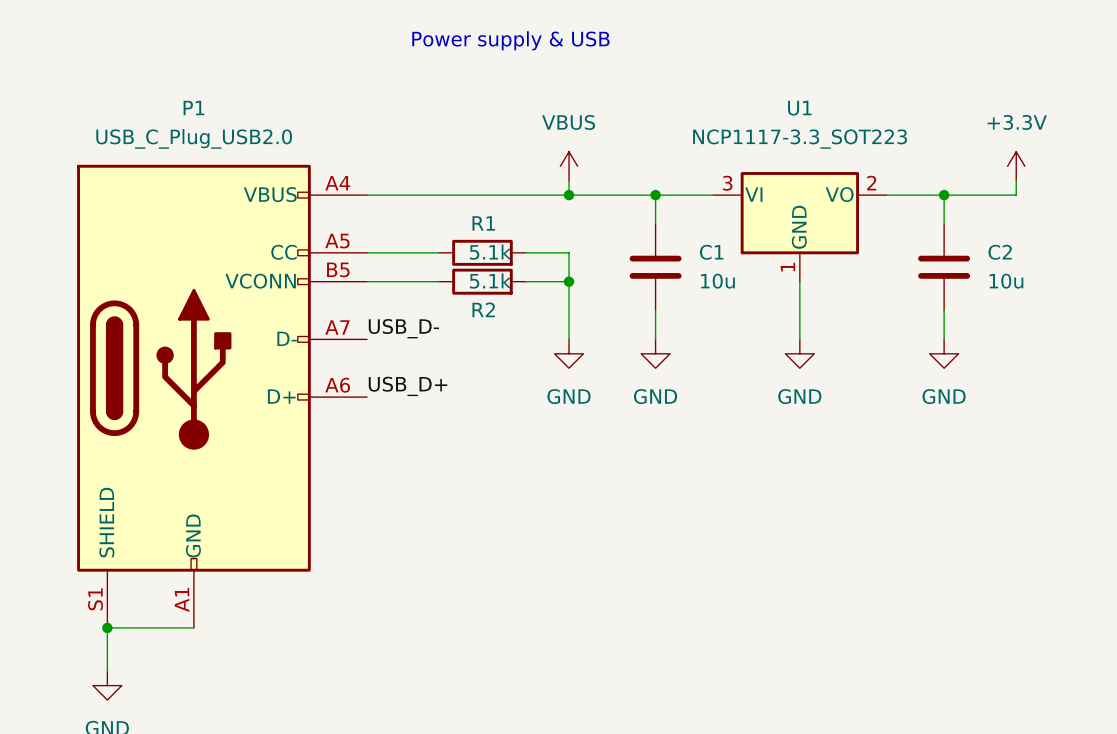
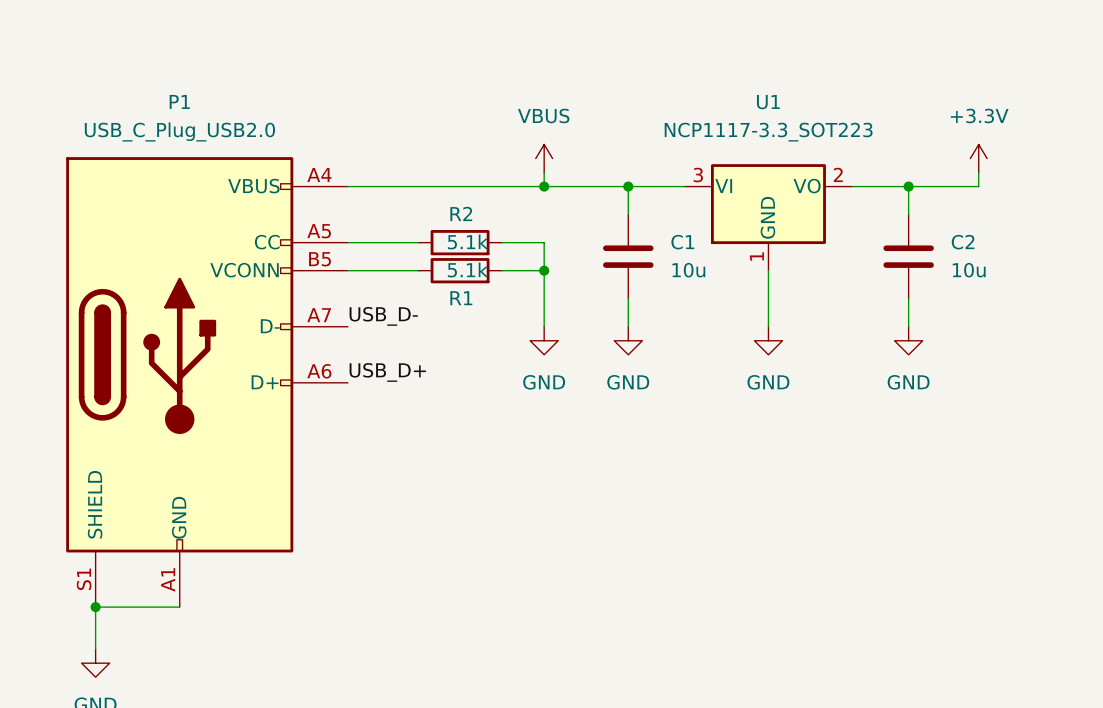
text: Power supply & USB (510, 40) -> none
R1 name: R1 (483, 223) -> R2 (461, 213)
R2 name: R2 (483, 309) -> R1 (461, 298)

